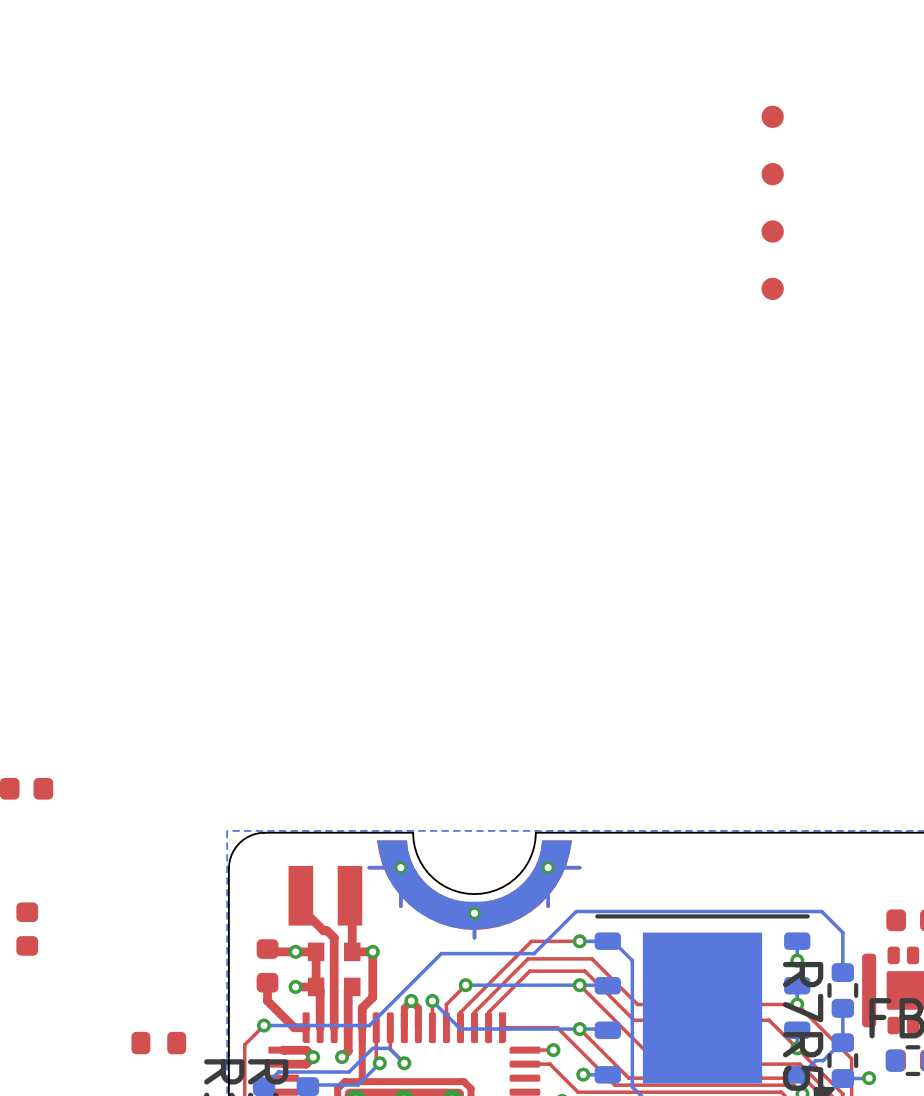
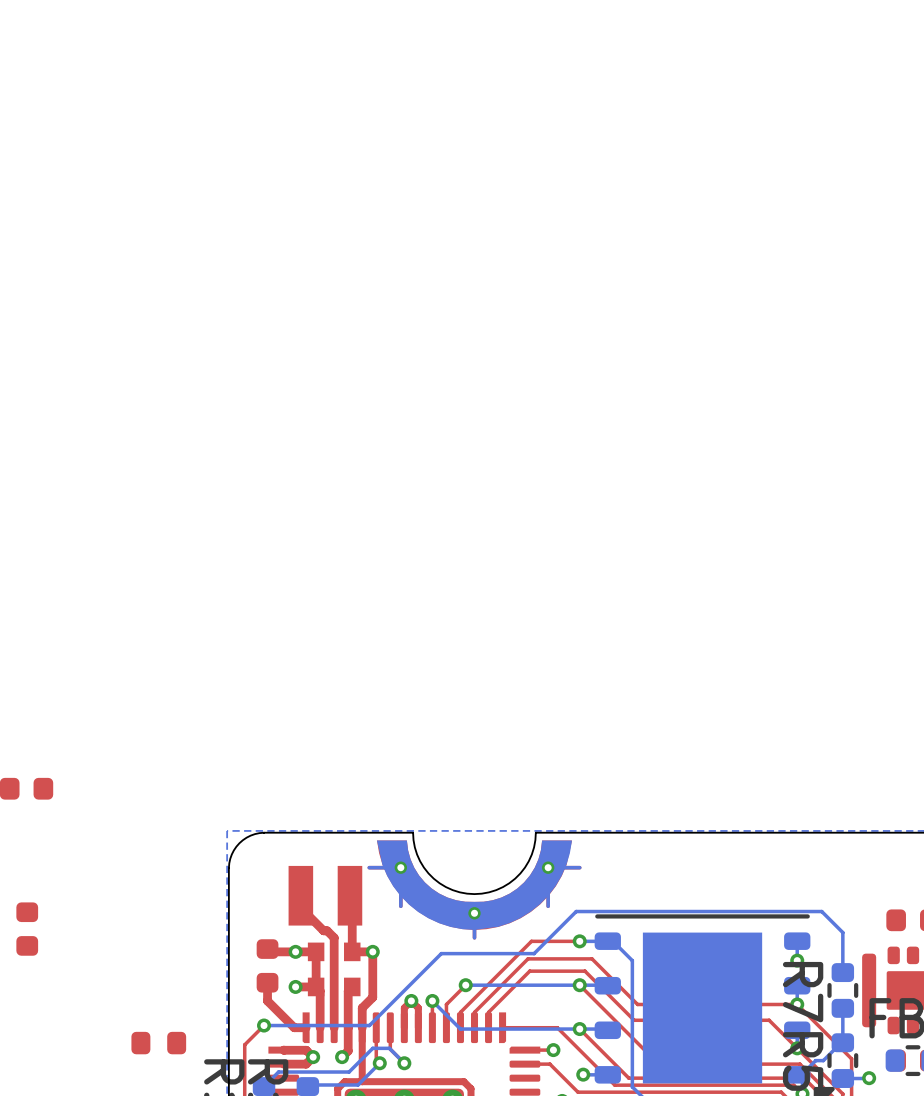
part: (772, 116) -> none
part: (772, 174) -> none
part: (772, 231) -> none
part: (772, 288) -> none

